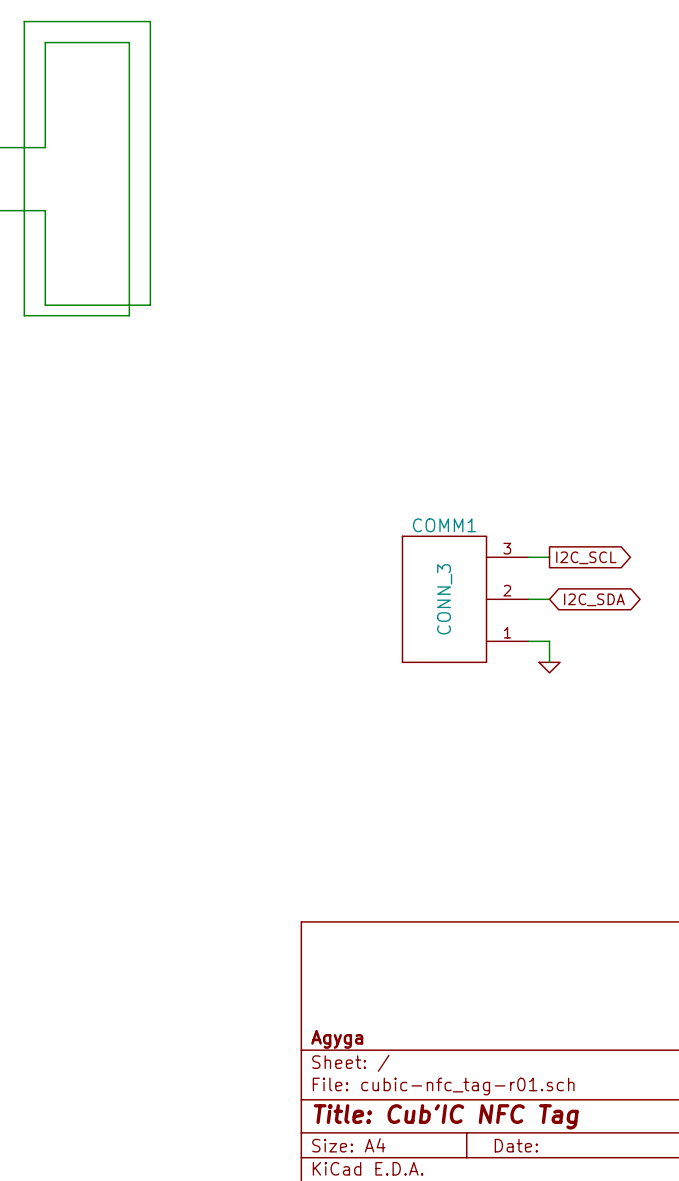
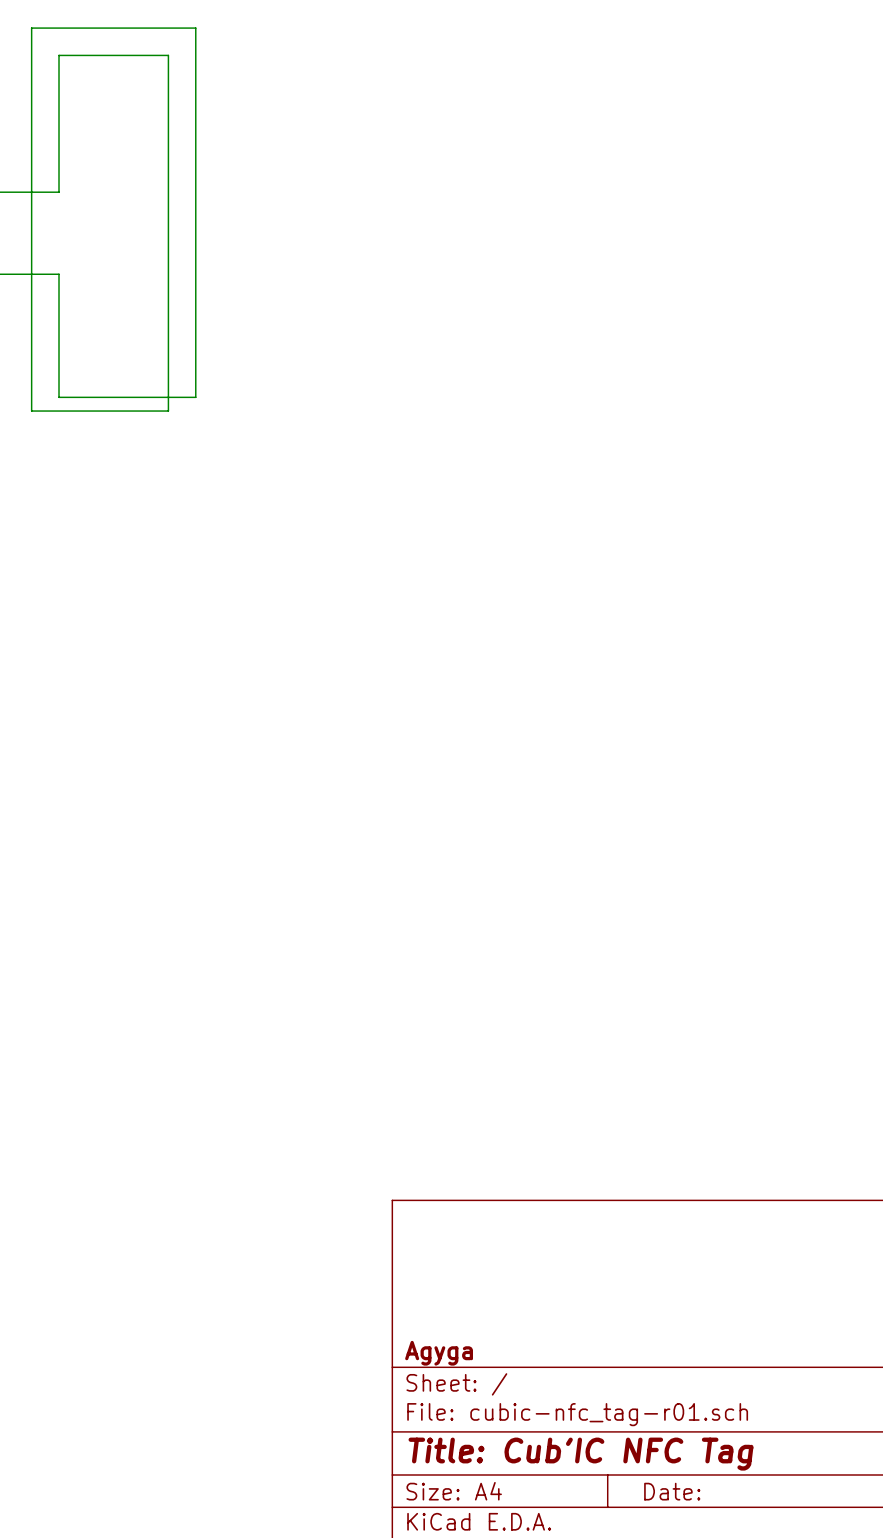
wire: (528, 557) (549, 557) -> none
global label: I2C_SCL (586, 557) -> none
COMM1: CONN_3 (465, 599) -> none
wire: (528, 599) (549, 599) -> none
global label: I2C_SDA (594, 599) -> none
wire: (528, 641) (549, 641) (549, 662) -> none
power symbol: (549, 667) -> none

